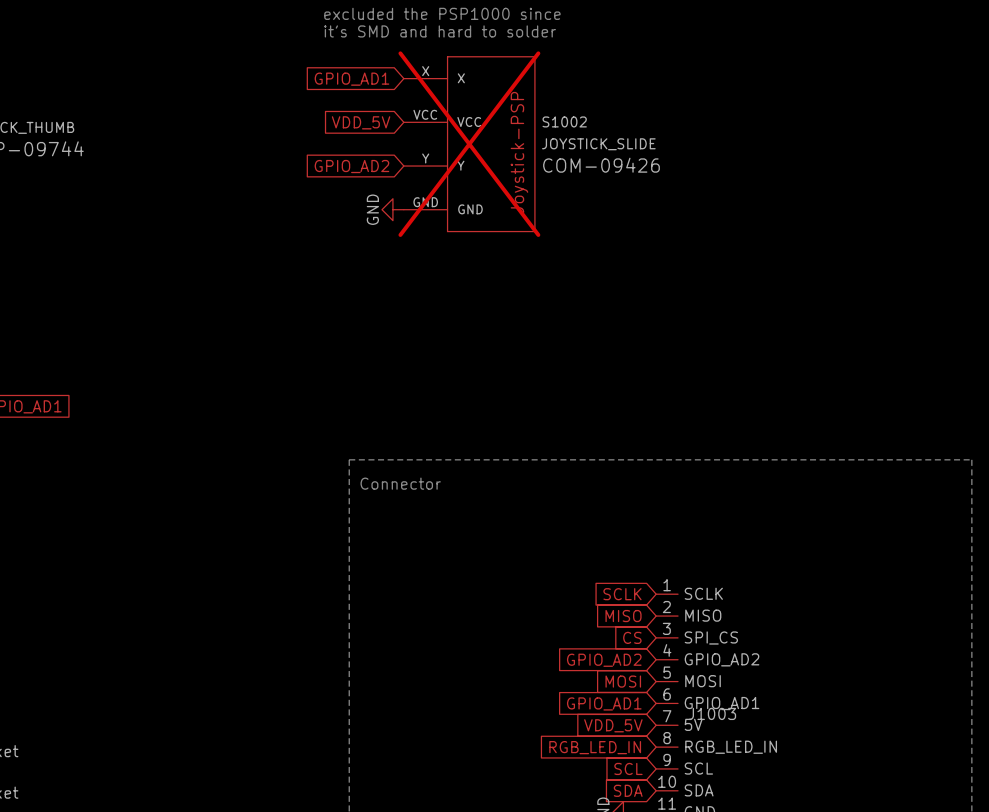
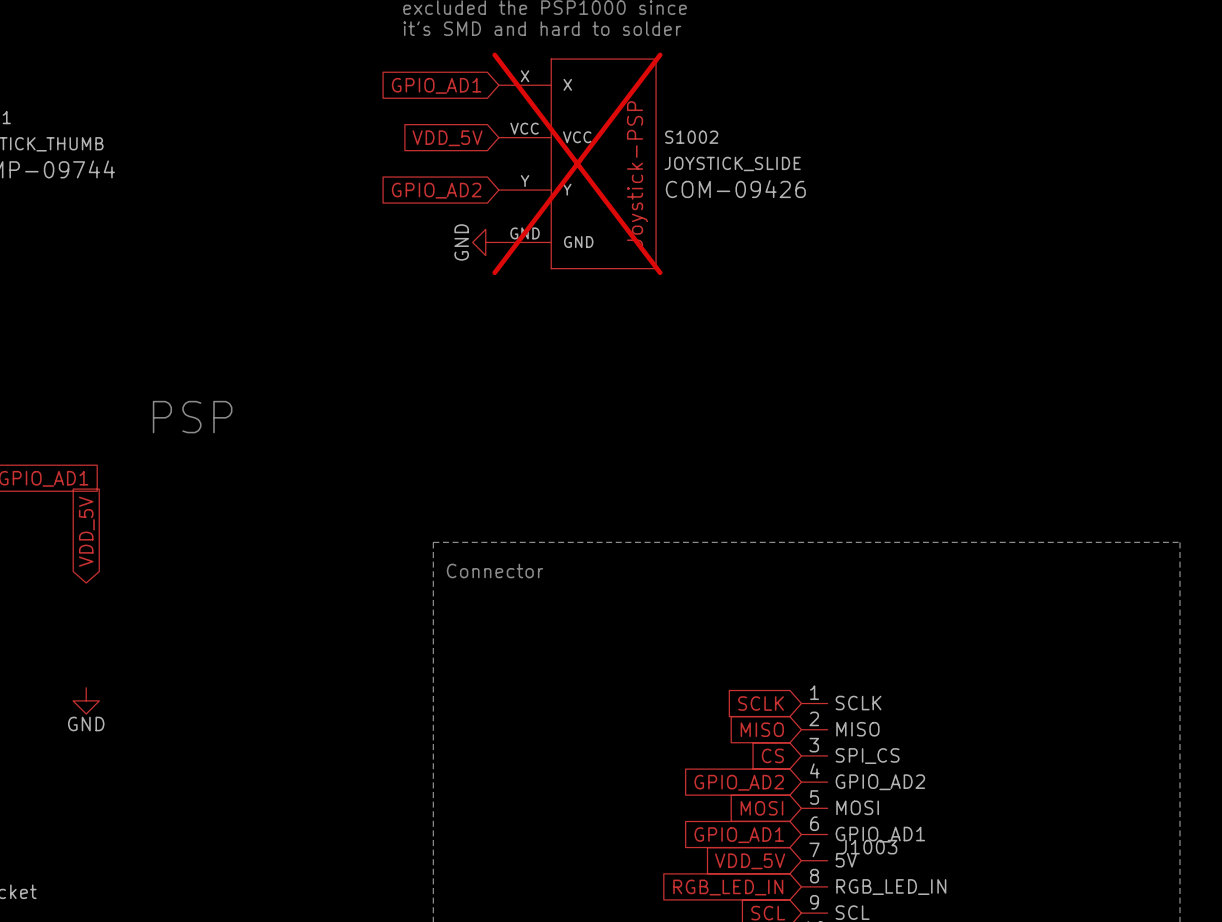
text: none -> PSP (192, 417)
global label: none -> VDD_5V (86, 531)
power symbol: none -> GND (86, 700)

